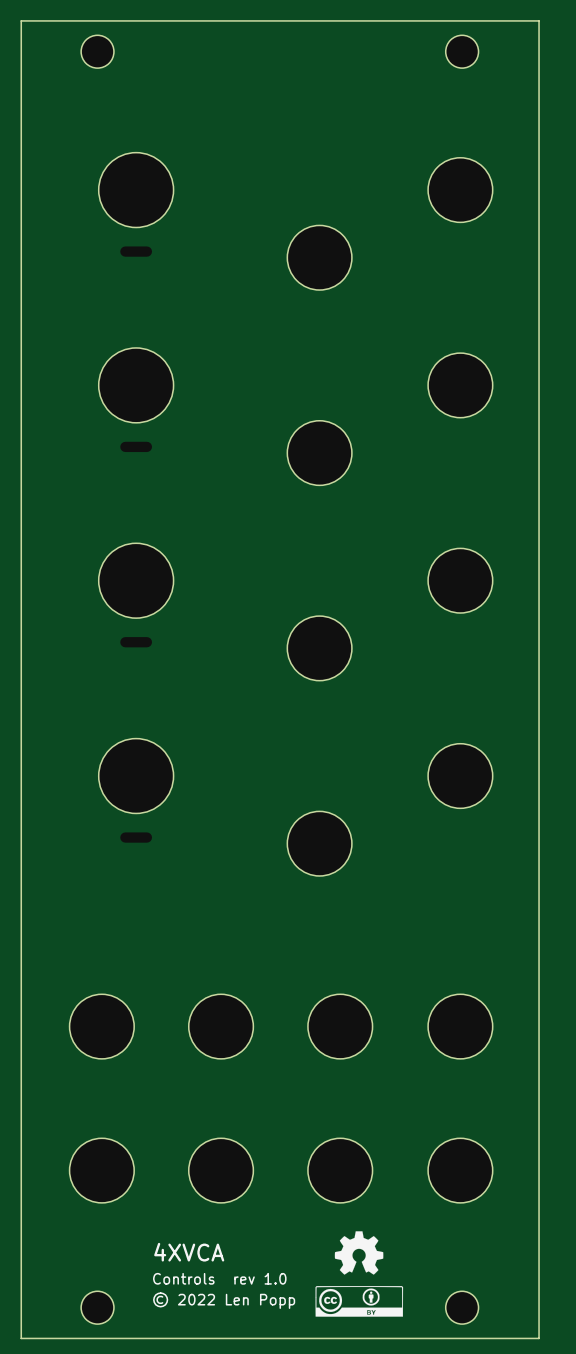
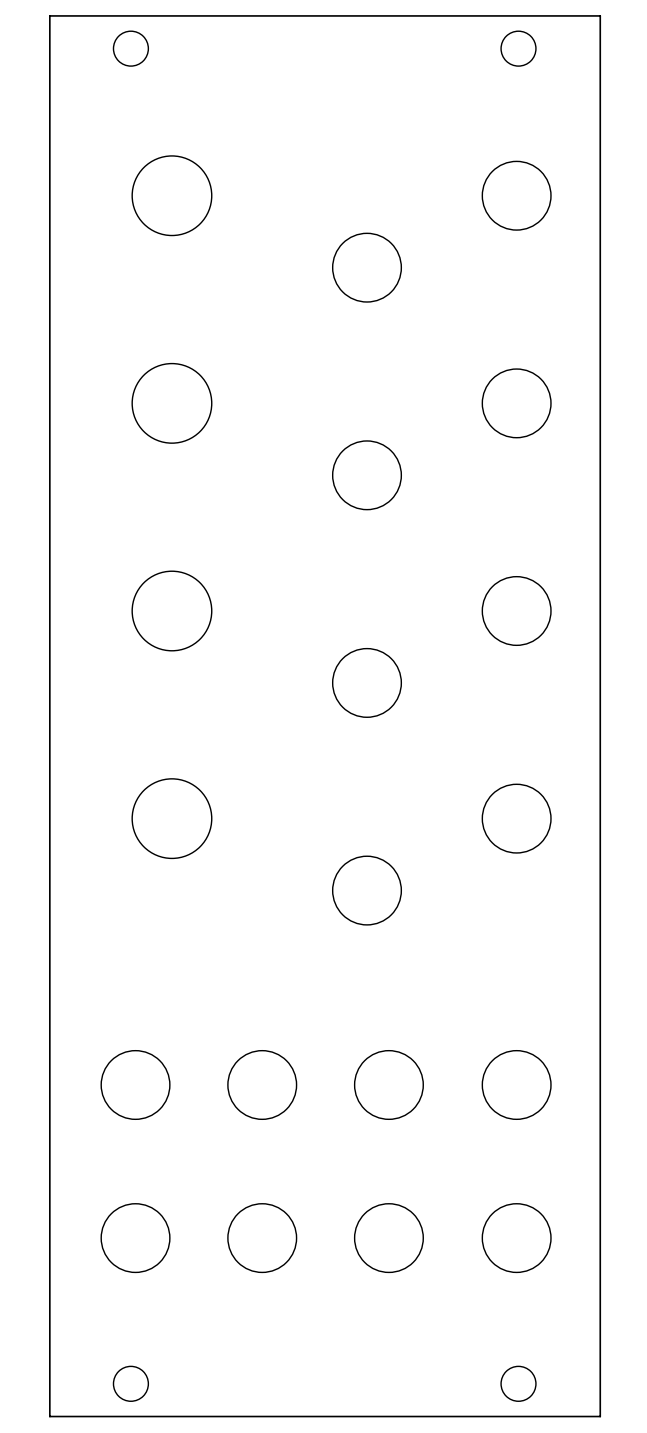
drawing: [315, 1231, 404, 1317] -> none
text: 4XVCA (189, 1252) -> none
text: Controls (183, 1278) -> none
text: rev 1.0 (260, 1278) -> none
text: © 2022 Len Popp (224, 1300) -> none

